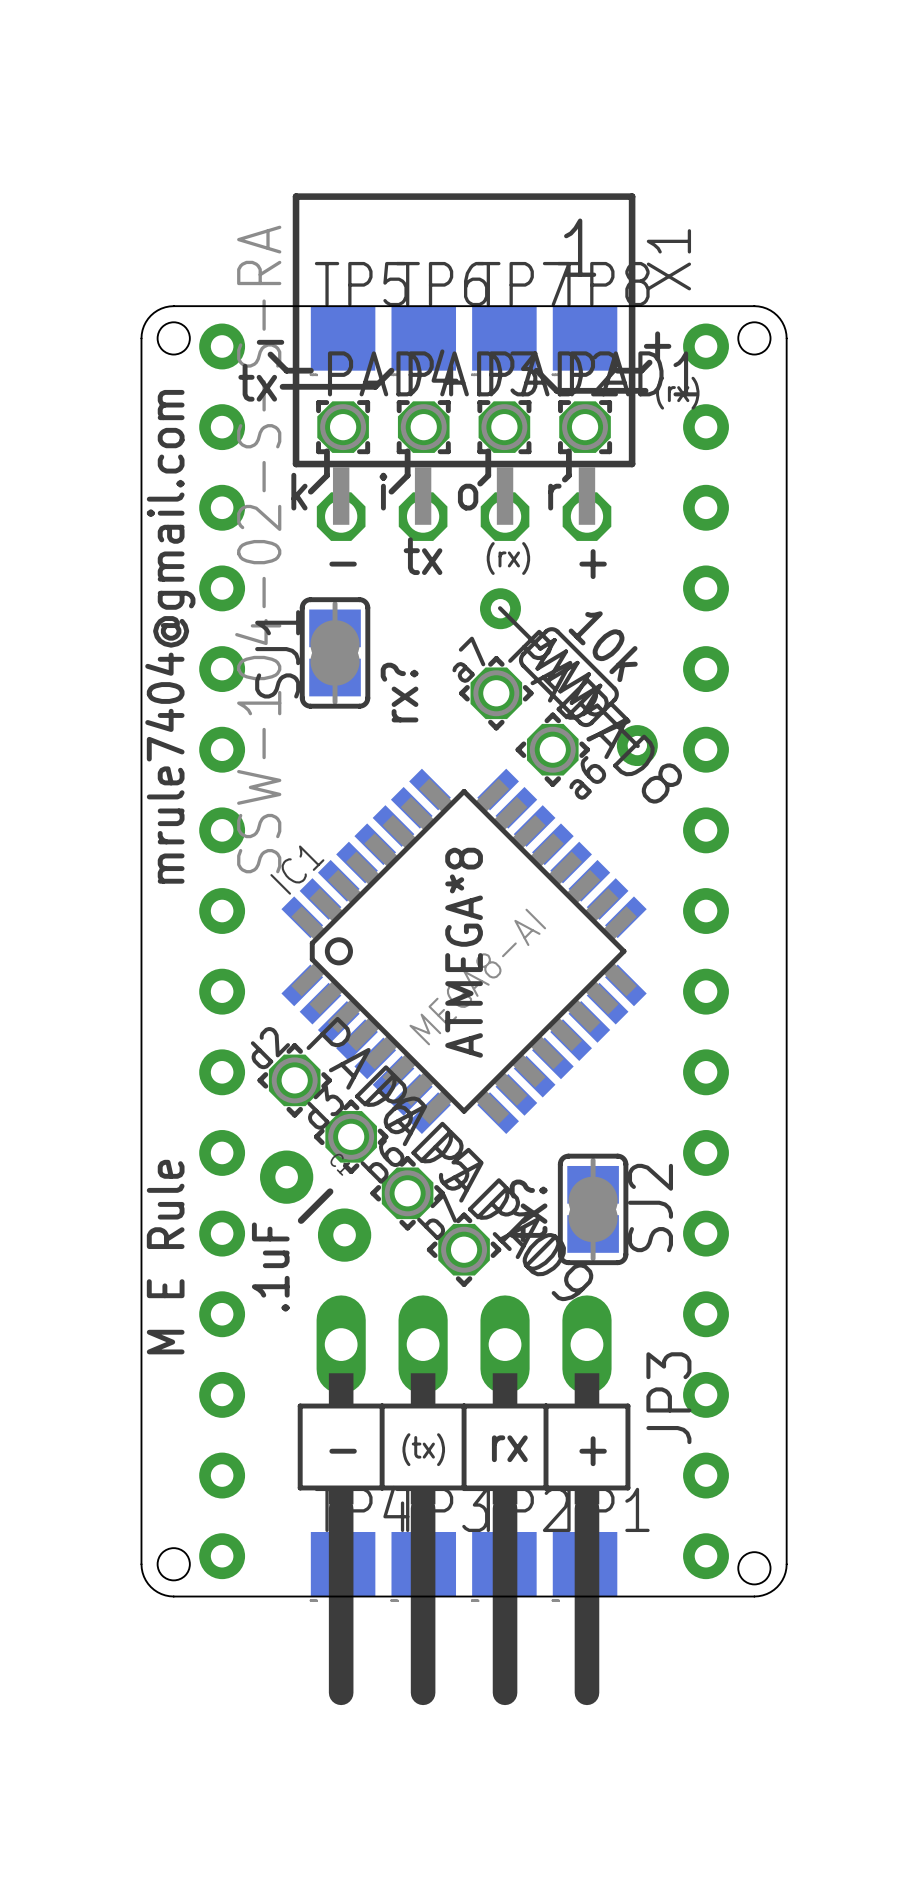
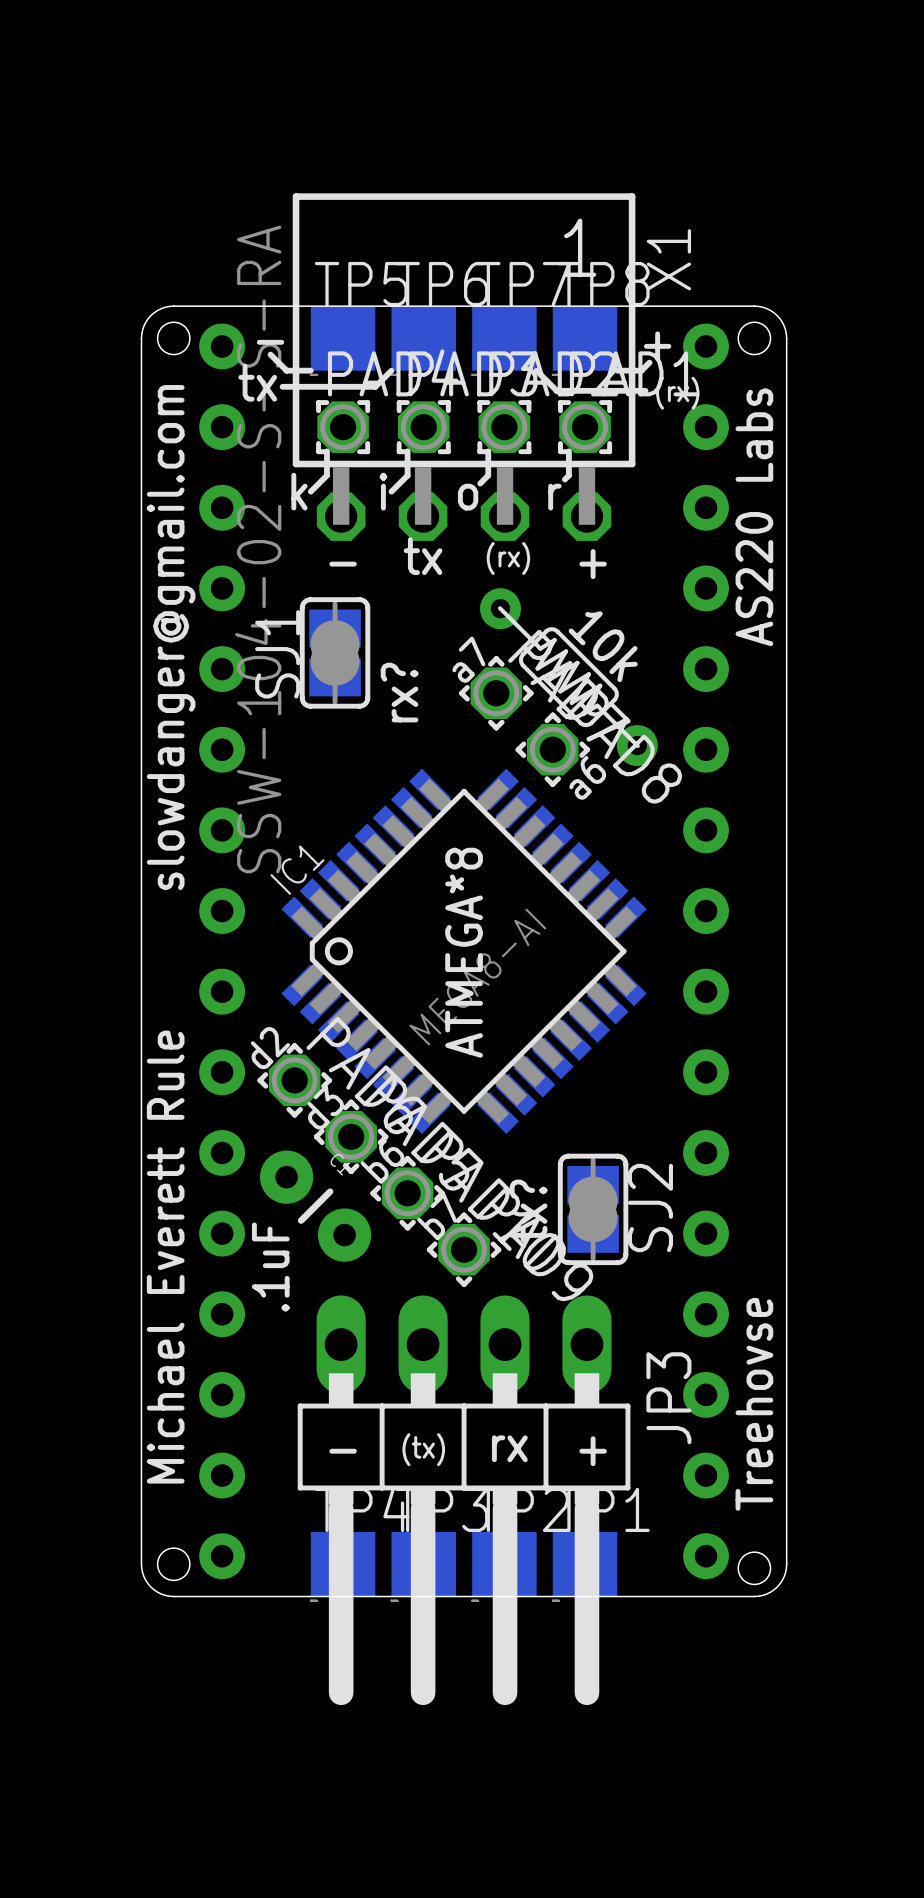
text: none -> AS220 Labs (754, 517)
text: mrule7404@gmail.com (170, 636) -> slowdanger@gmail.com (171, 637)
text: M E Rule (165, 1257) -> Michael Everett Rule (165, 1257)
text: none -> Treehovse (754, 1404)

